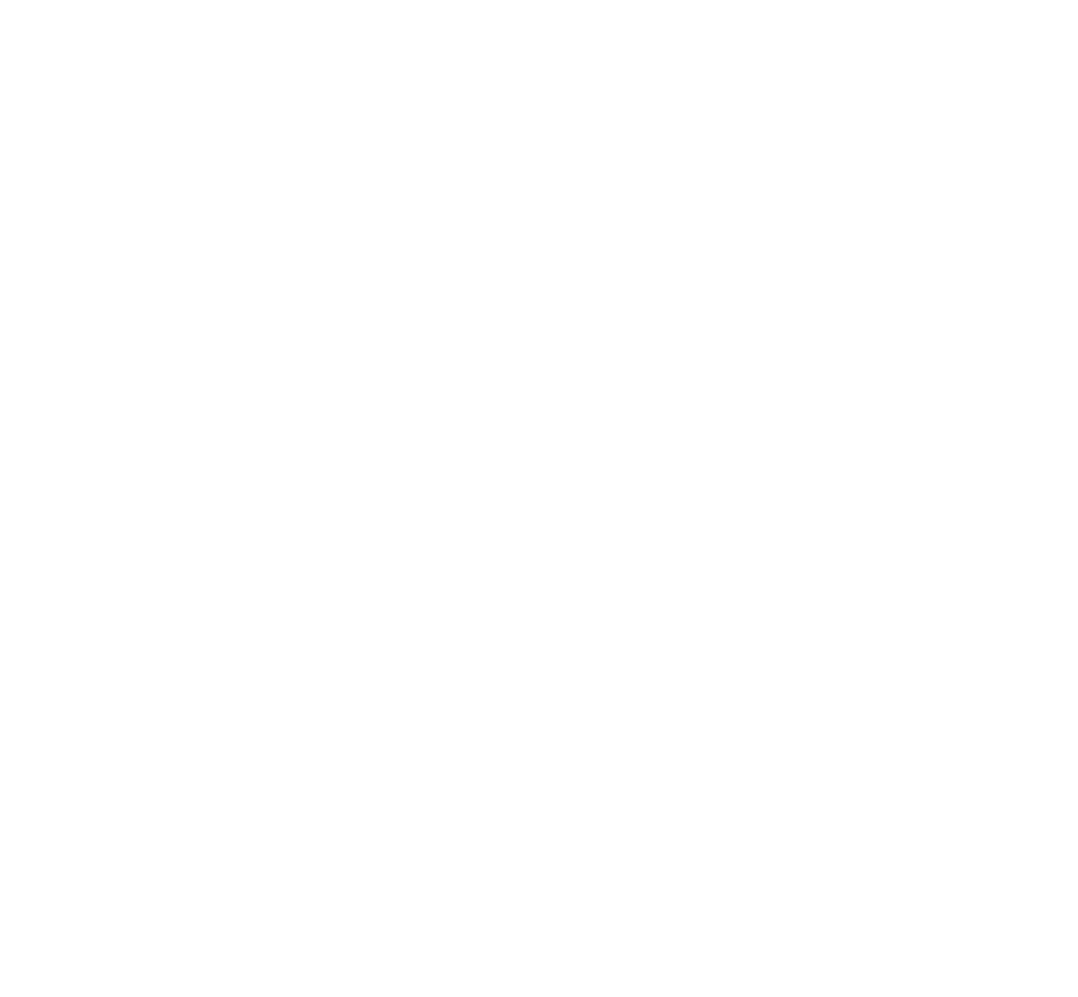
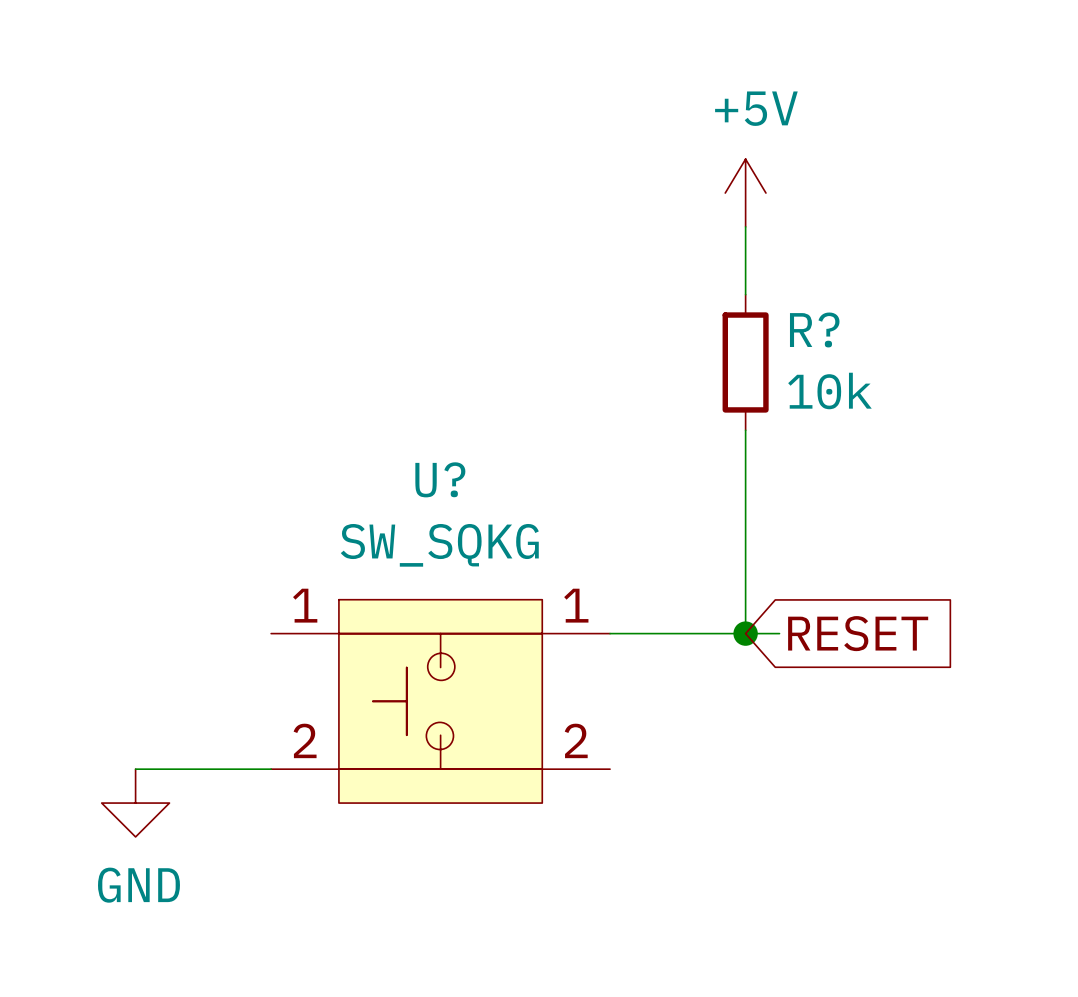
power symbol: none -> +5V (745, 193)
wire: none -> (745, 226) (745, 294)
R?: none -> 10k (745, 362)
wire: none -> (745, 430) (745, 633)
wire: none -> (610, 633) (779, 633)
junction: none -> (745, 633)
global label: none -> RESET (858, 633)
U?: none -> SW_SQKG (440, 701)
wire: none -> (135, 769) (271, 769)
power symbol: none -> GND (135, 803)

